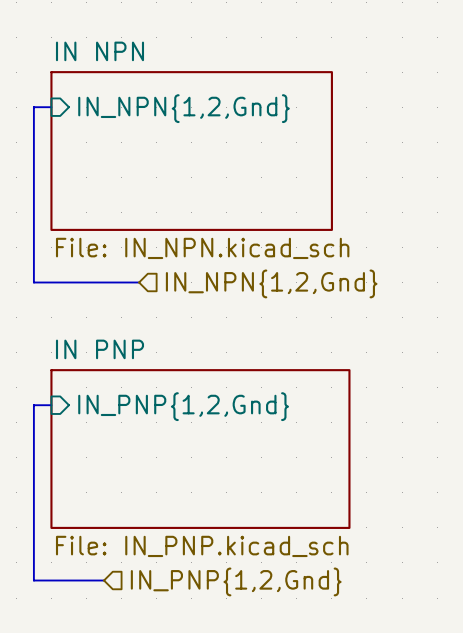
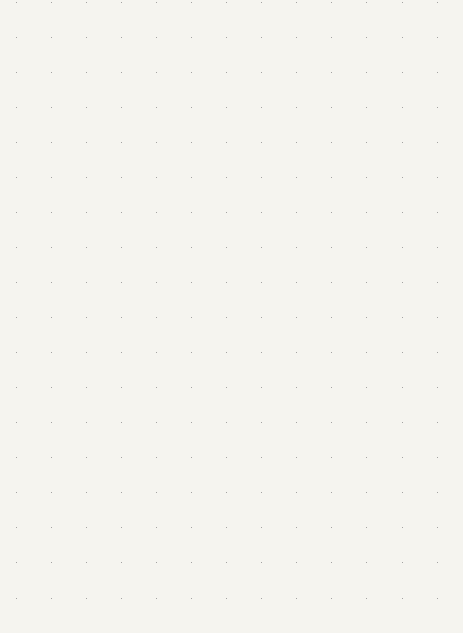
bus: (51, 107) (33, 107) (33, 282) (139, 282) -> none
sheet pin: IN_NPN{1,2,Gnd} (184, 108) -> none
sheet IN NPN: File: IN_NPN.kicad_sch (191, 151) -> none
hierarchical label: IN_NPN{1,2,Gnd} (271, 283) -> none
bus: (51, 405) (33, 405) (33, 580) (104, 580) -> none
sheet pin: IN_PNP{1,2,Gnd} (183, 406) -> none
sheet IN PNP: File: IN_PNP.kicad_sch (200, 449) -> none
hierarchical label: IN_PNP{1,2,Gnd} (236, 581) -> none

